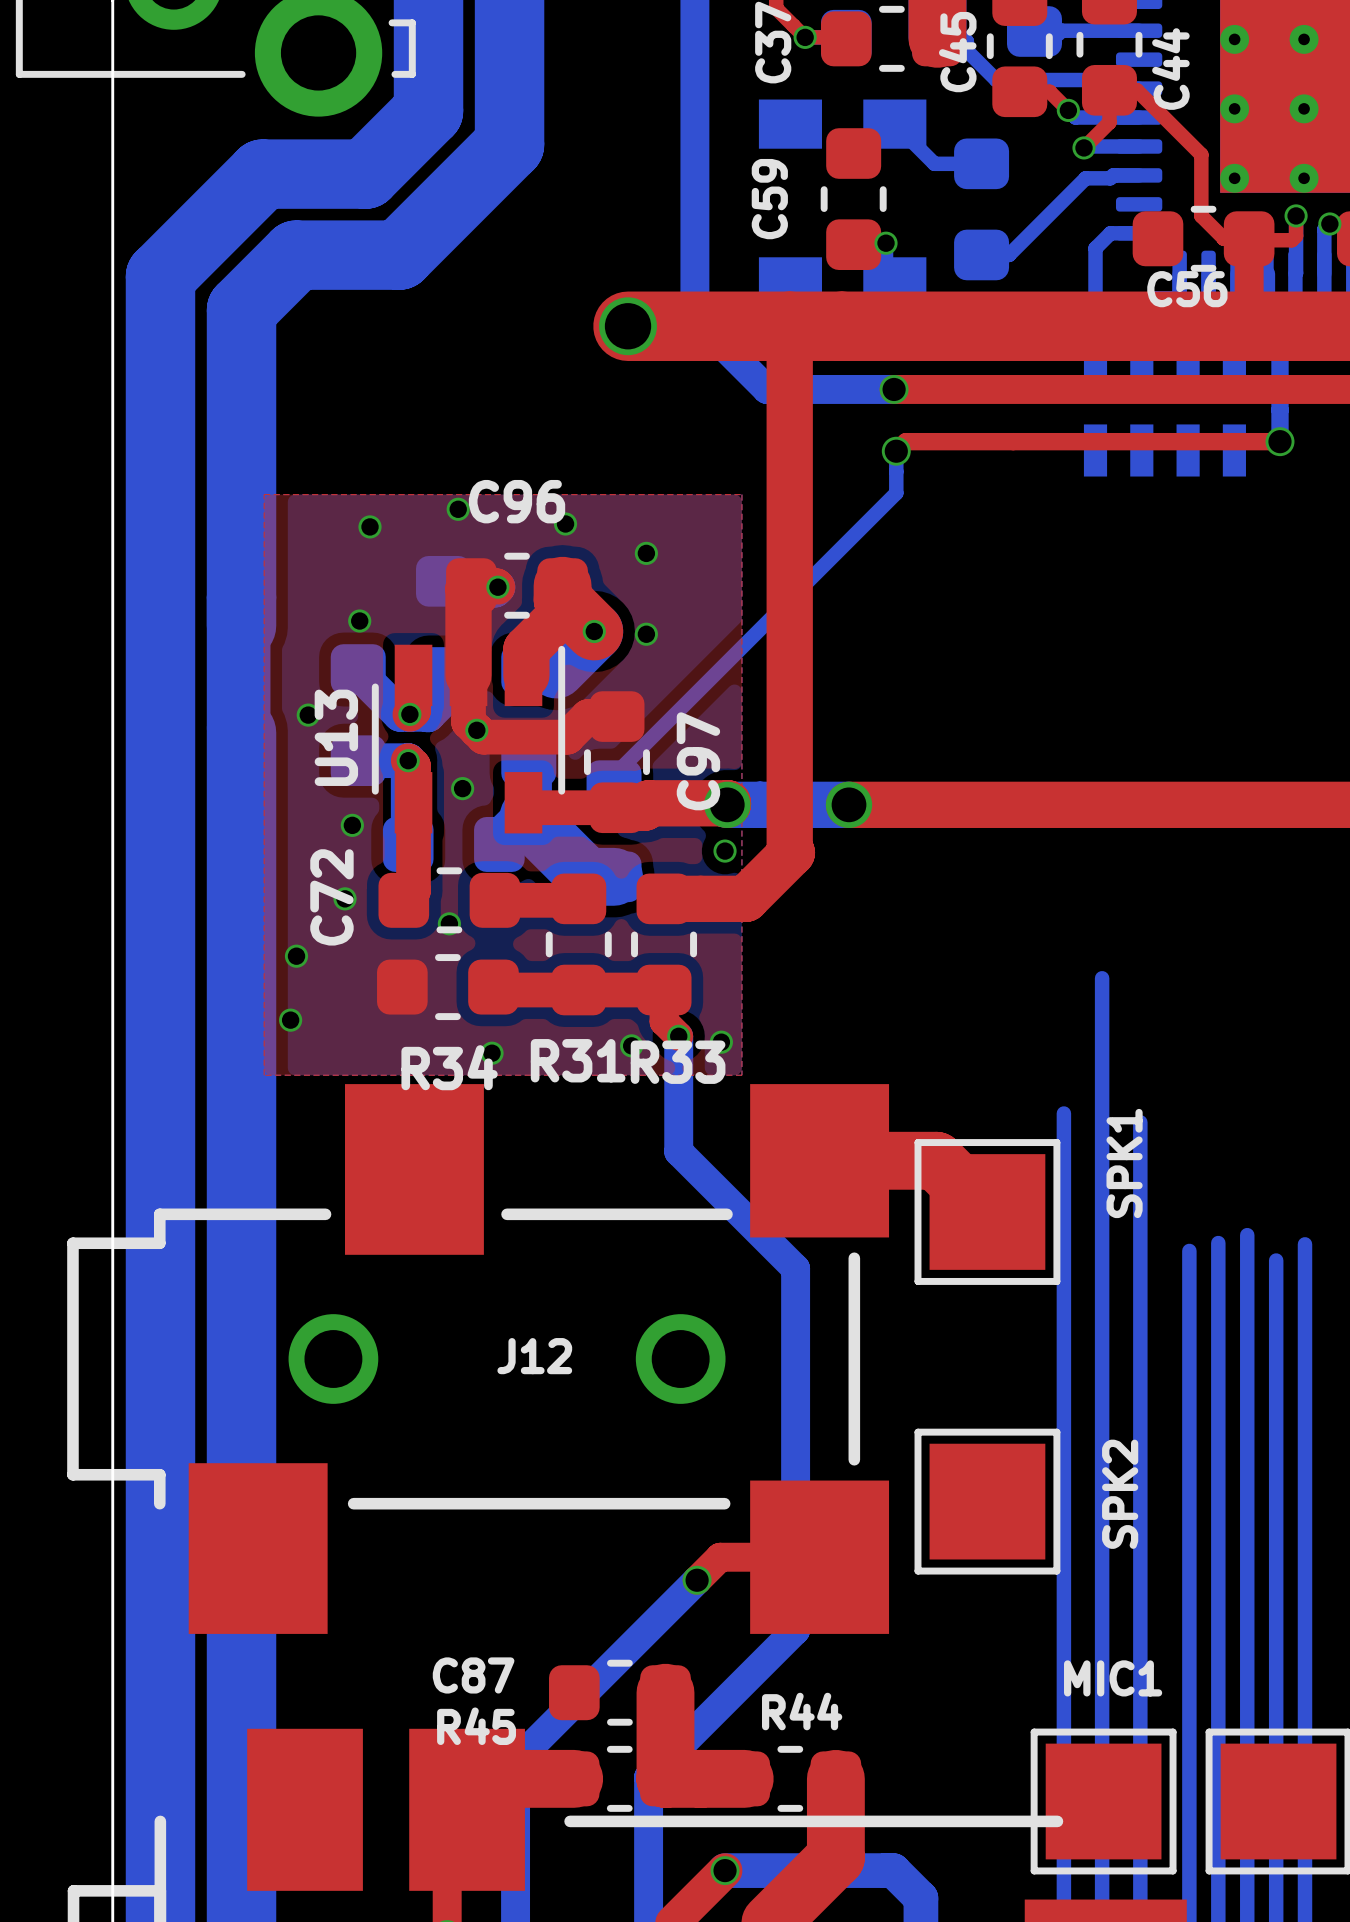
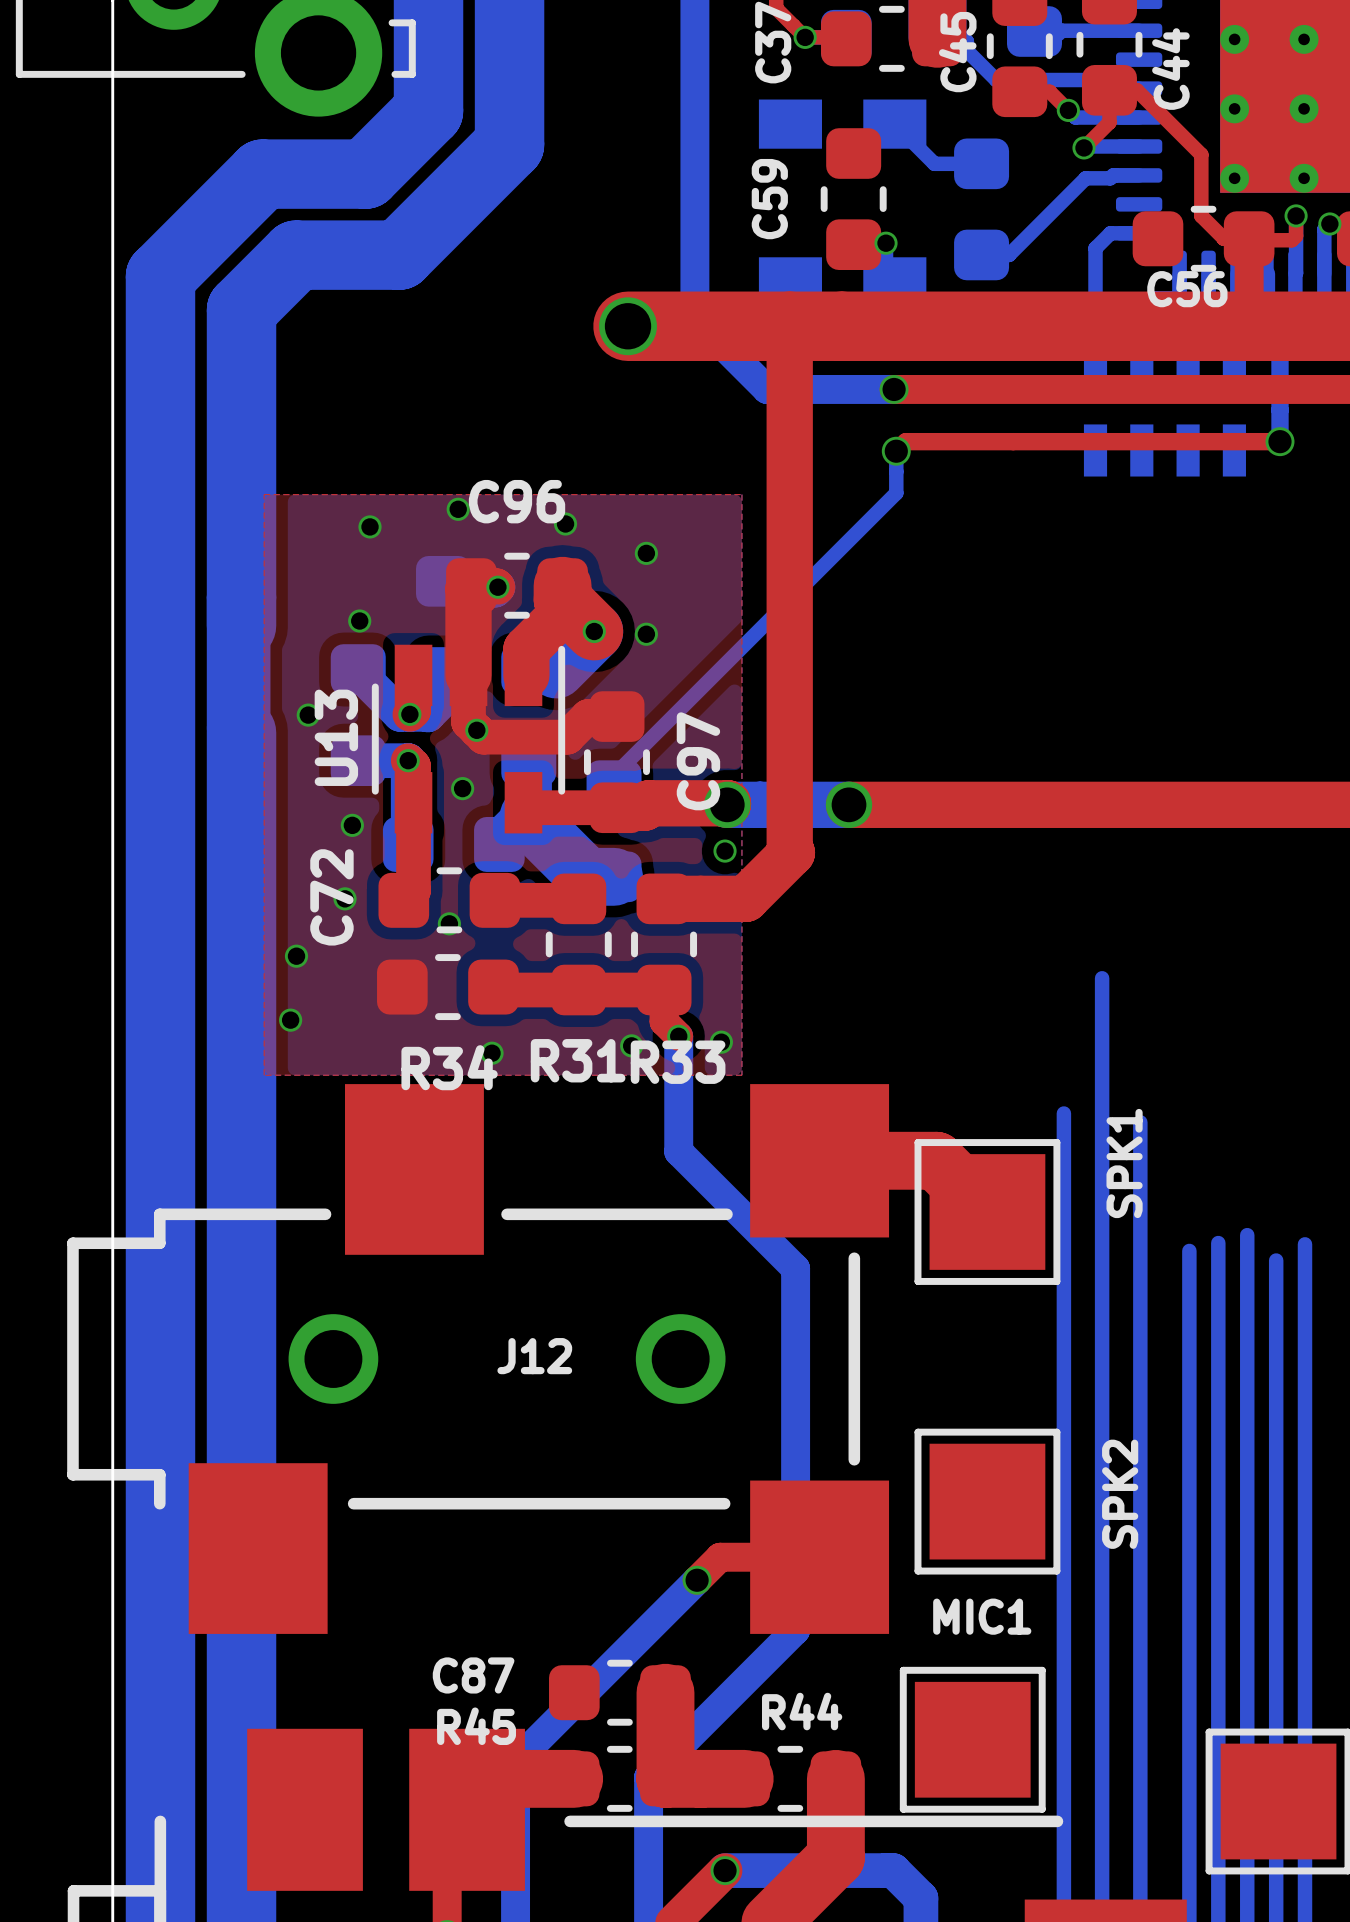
MIC1 position: (1103, 1801) -> (972, 1739)

